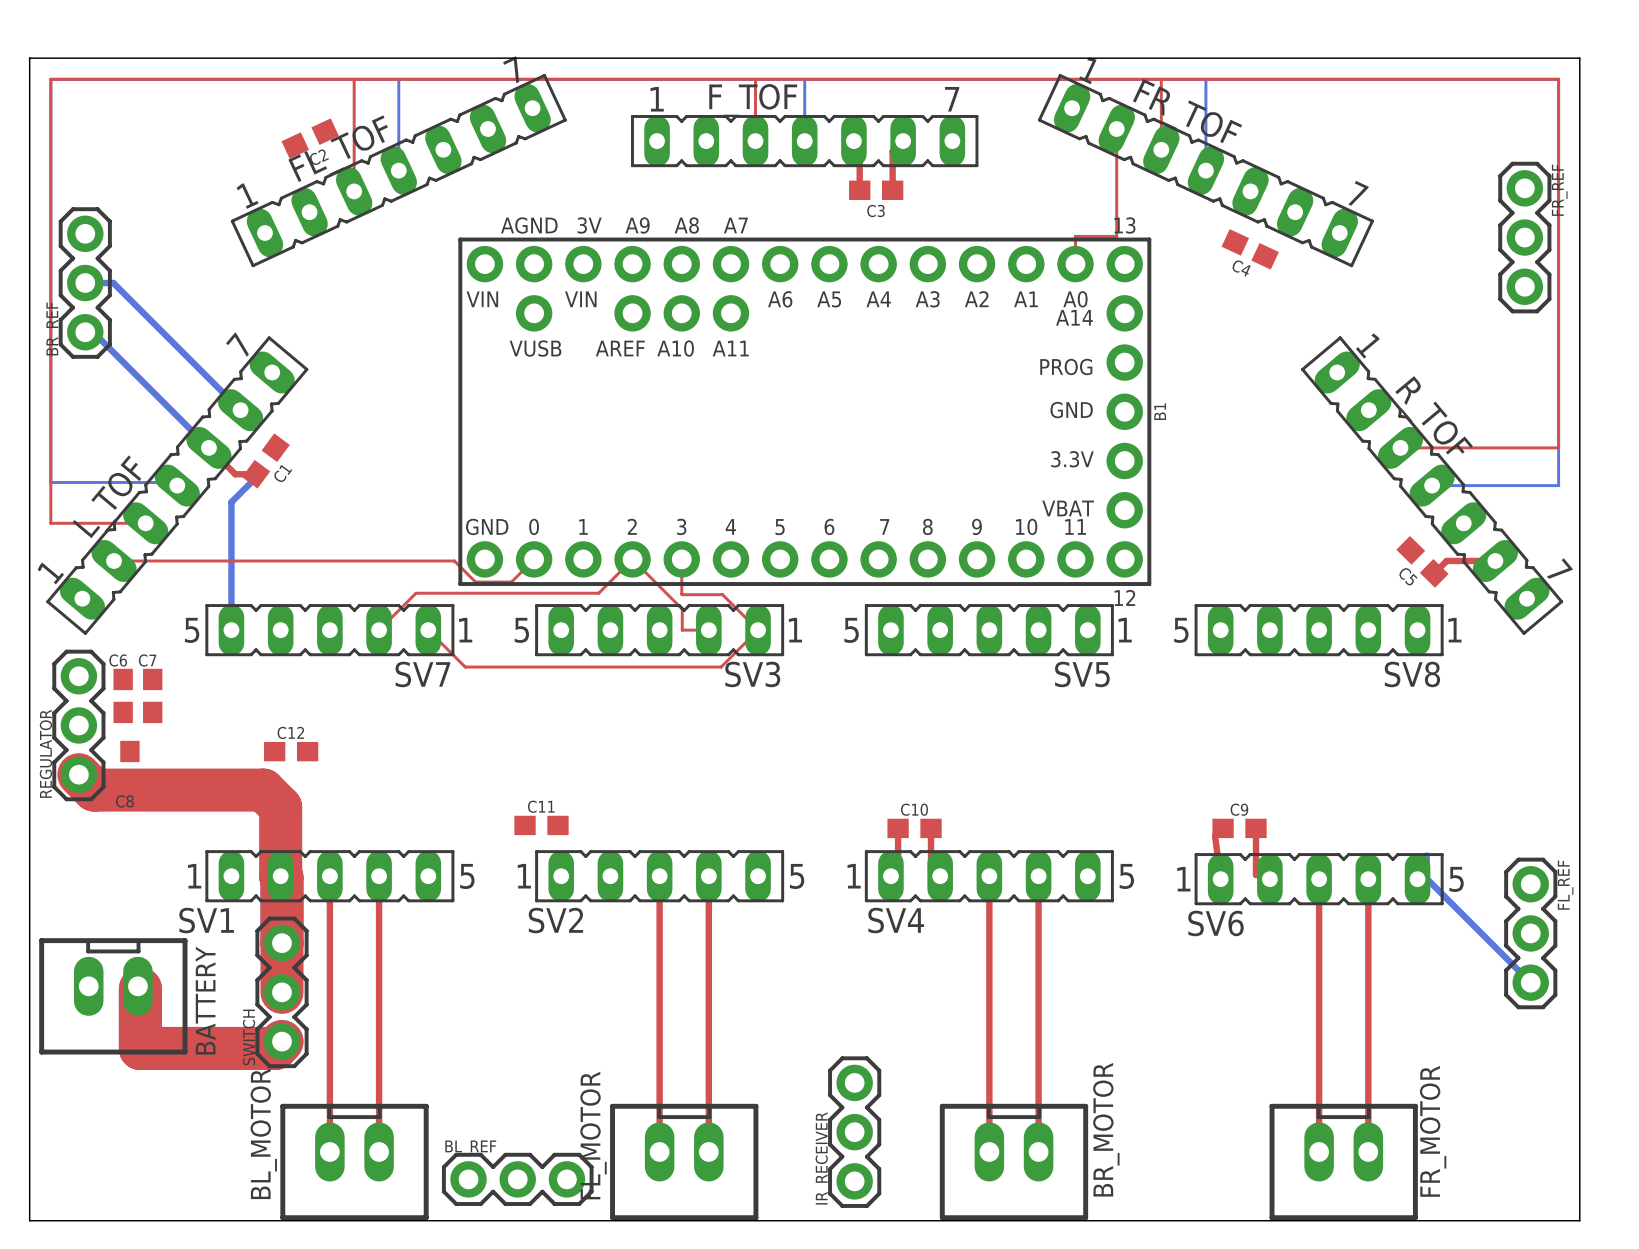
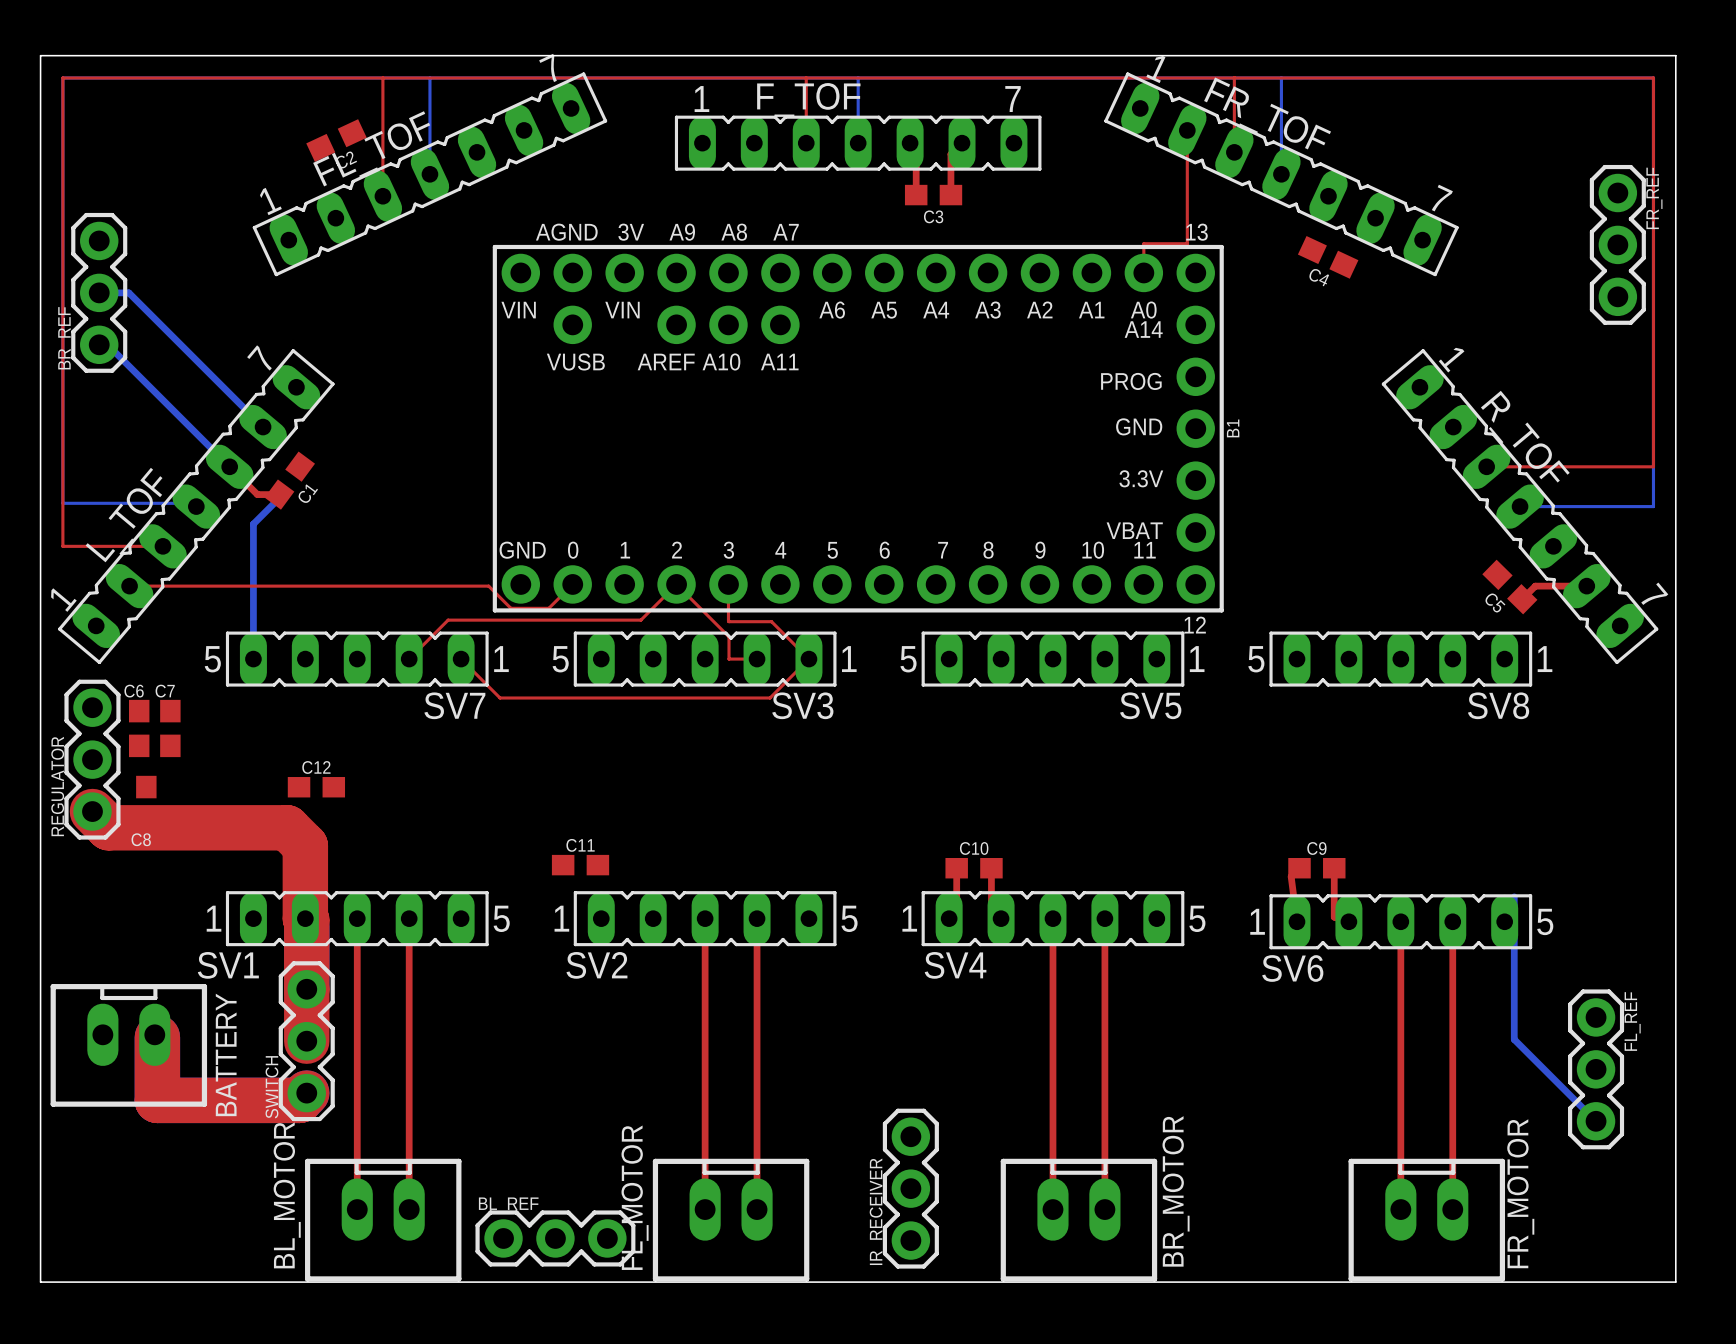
bottom track: (1426, 878) (1530, 982) -> (1514, 921) (1514, 1039) (1596, 1121)
FL_REF position: (1530, 933) -> (1596, 1069)

